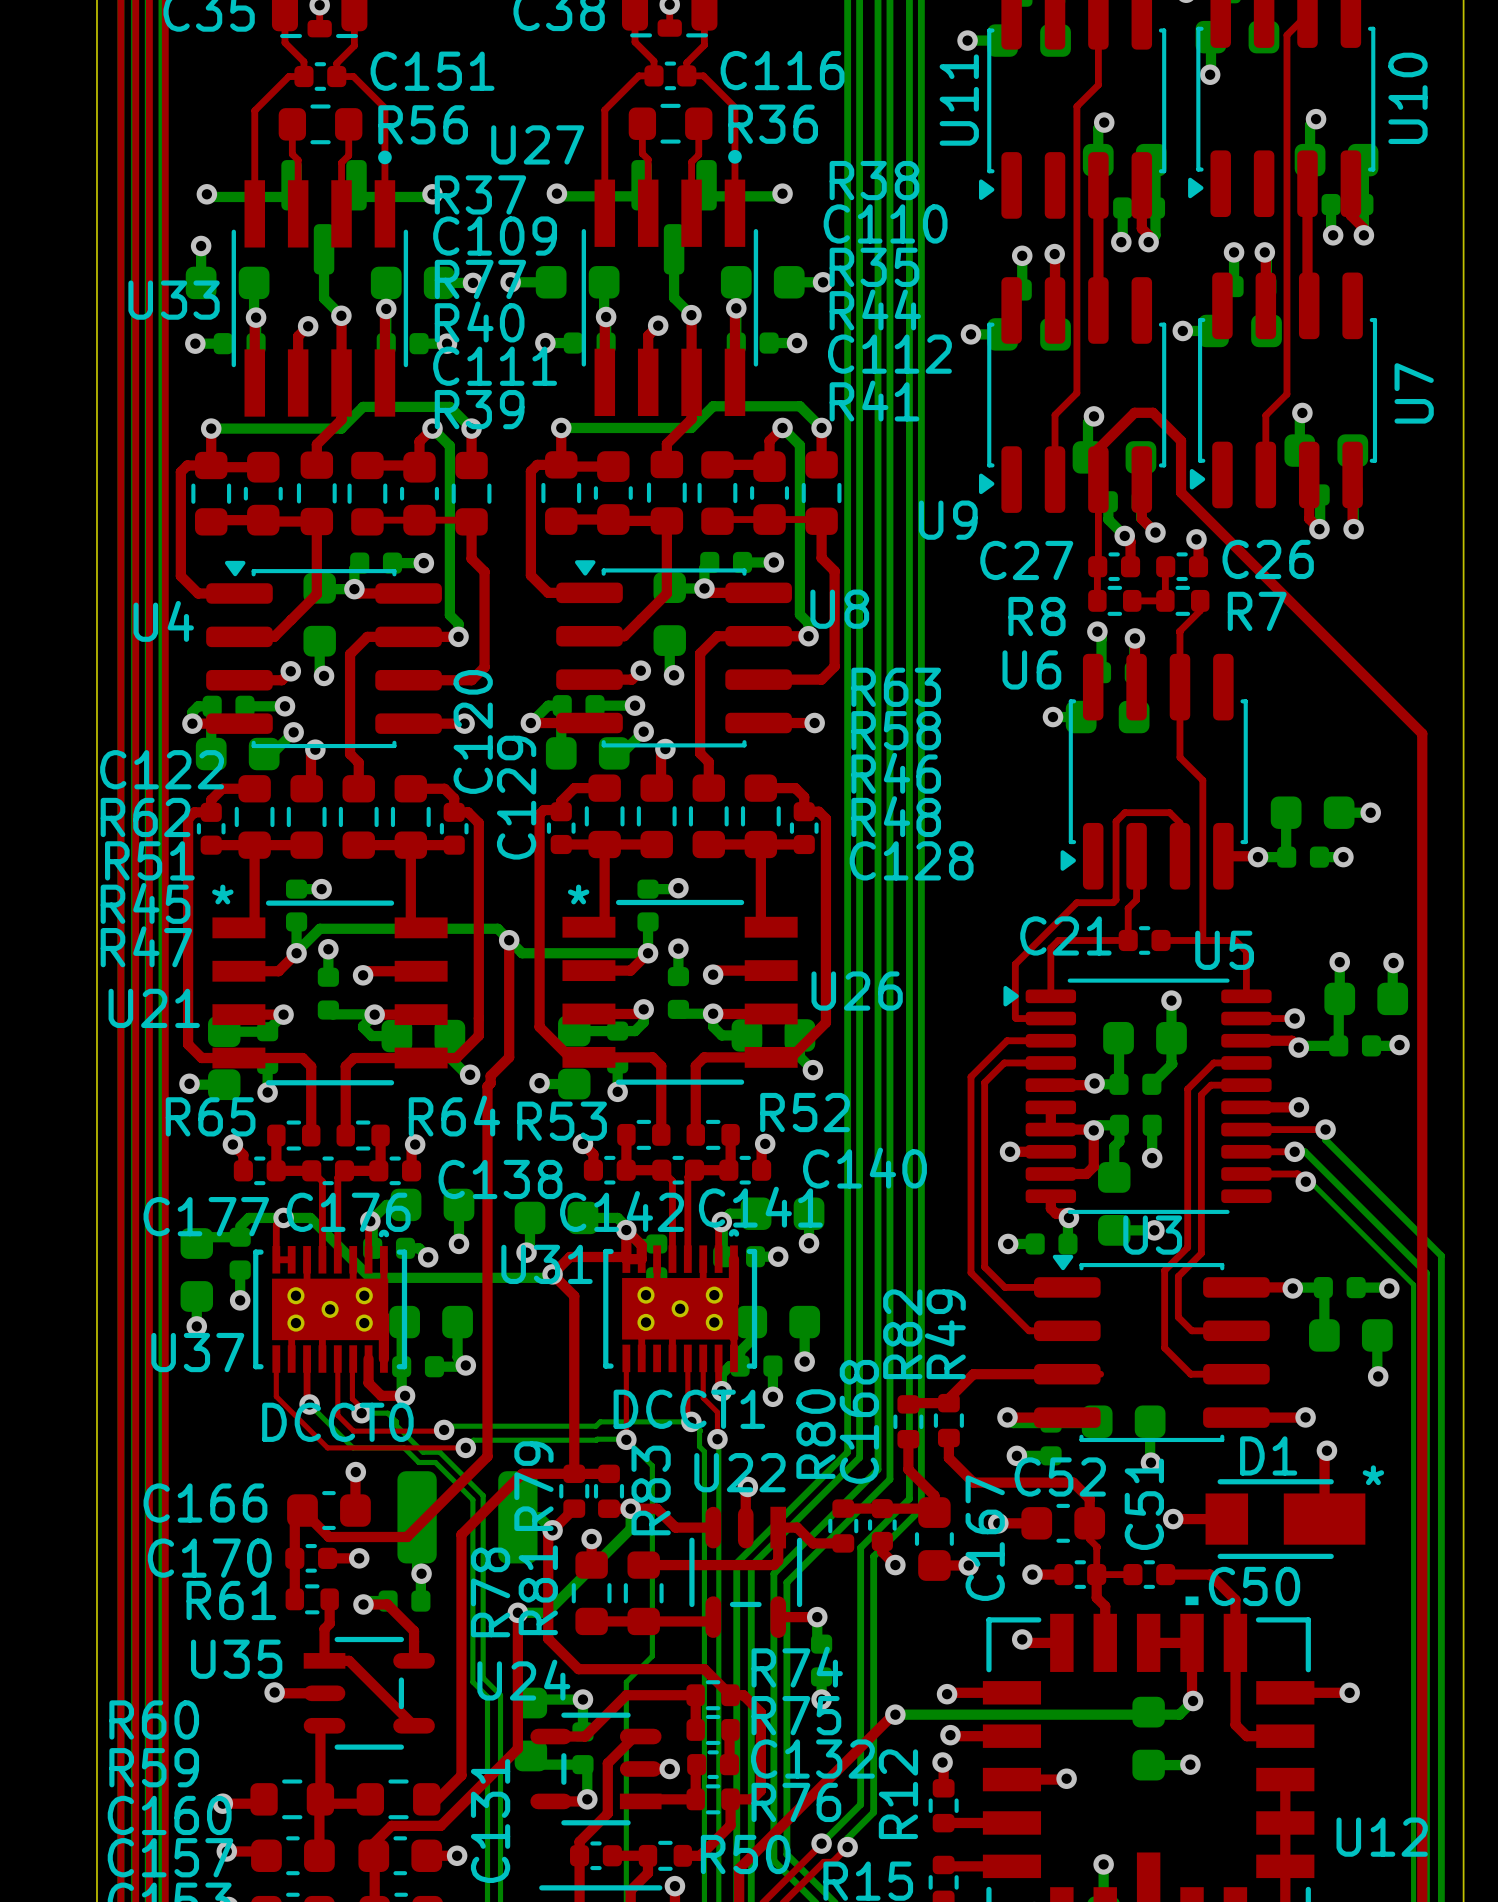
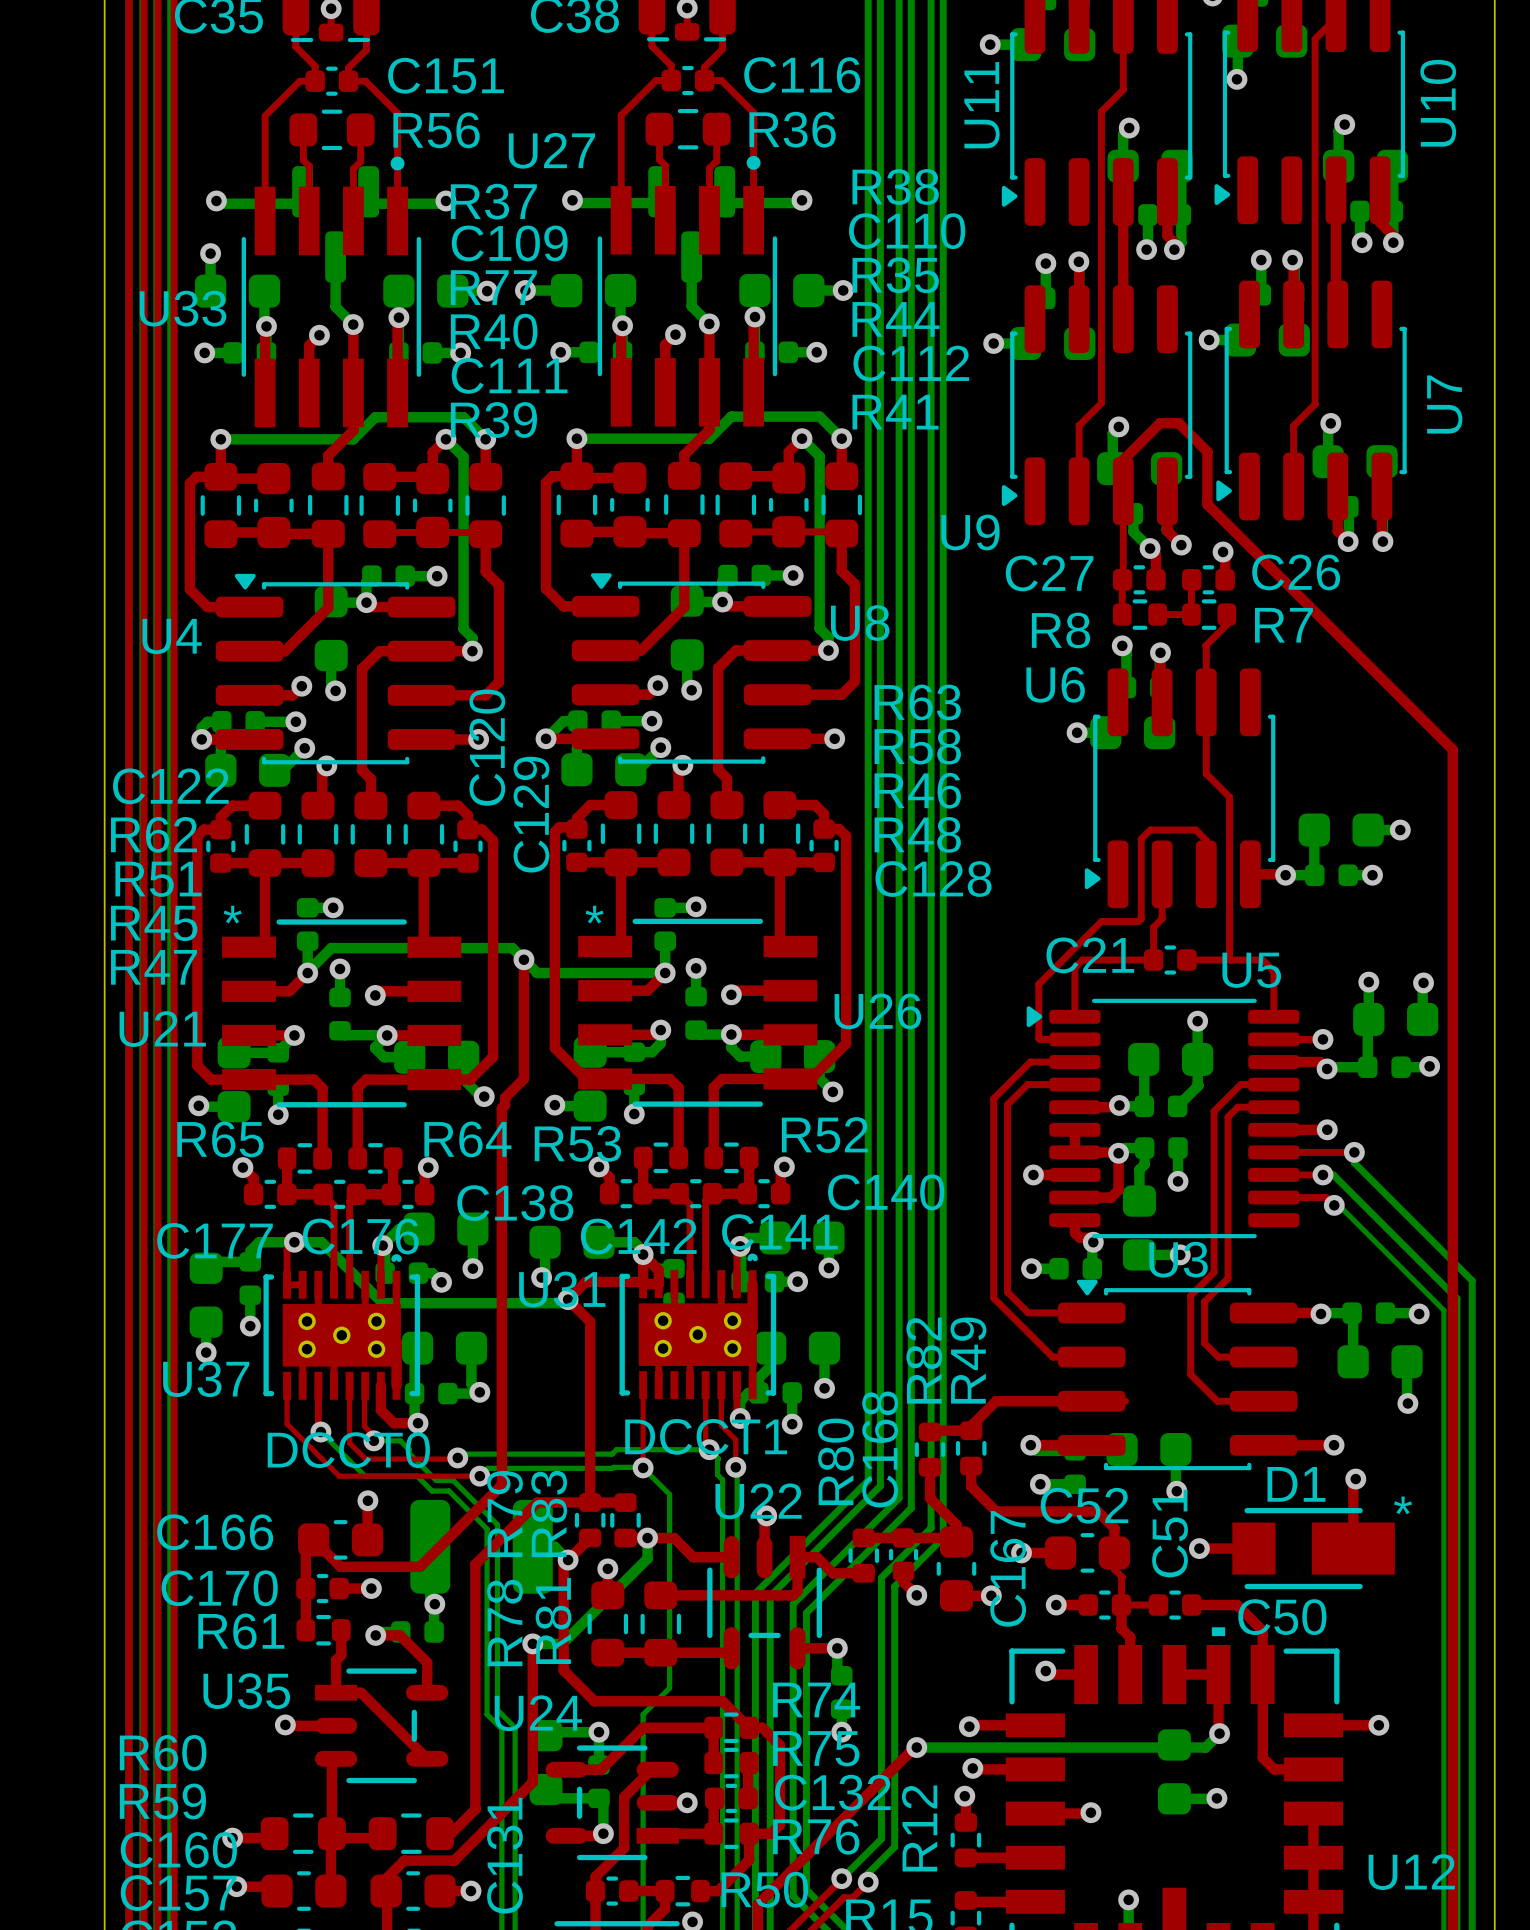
R79 name position: R79 (533, 1486) -> R79 (504, 1514)
R83 name position: R83 (651, 1490) -> R83 (549, 1513)

